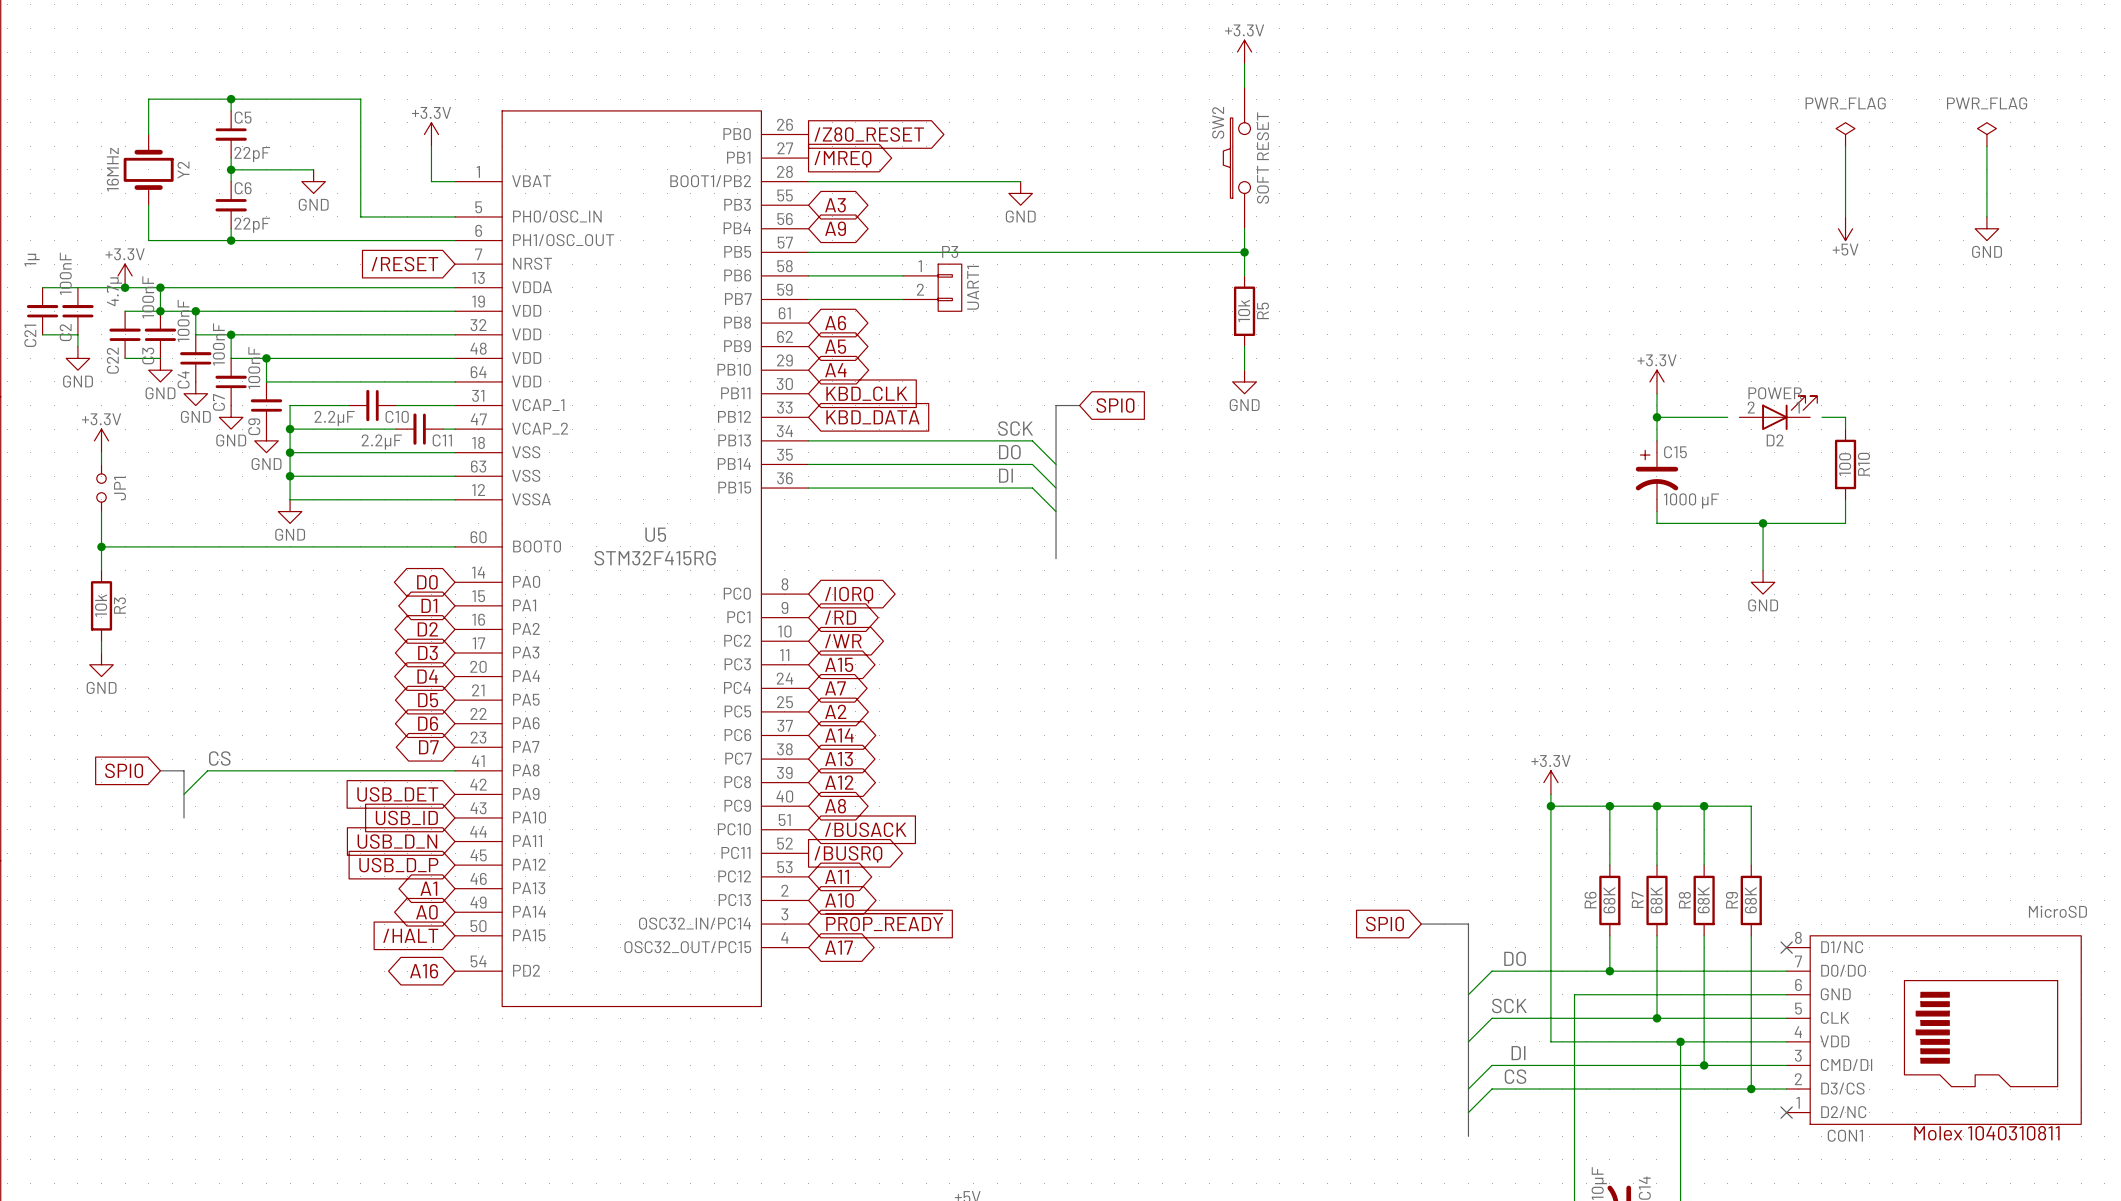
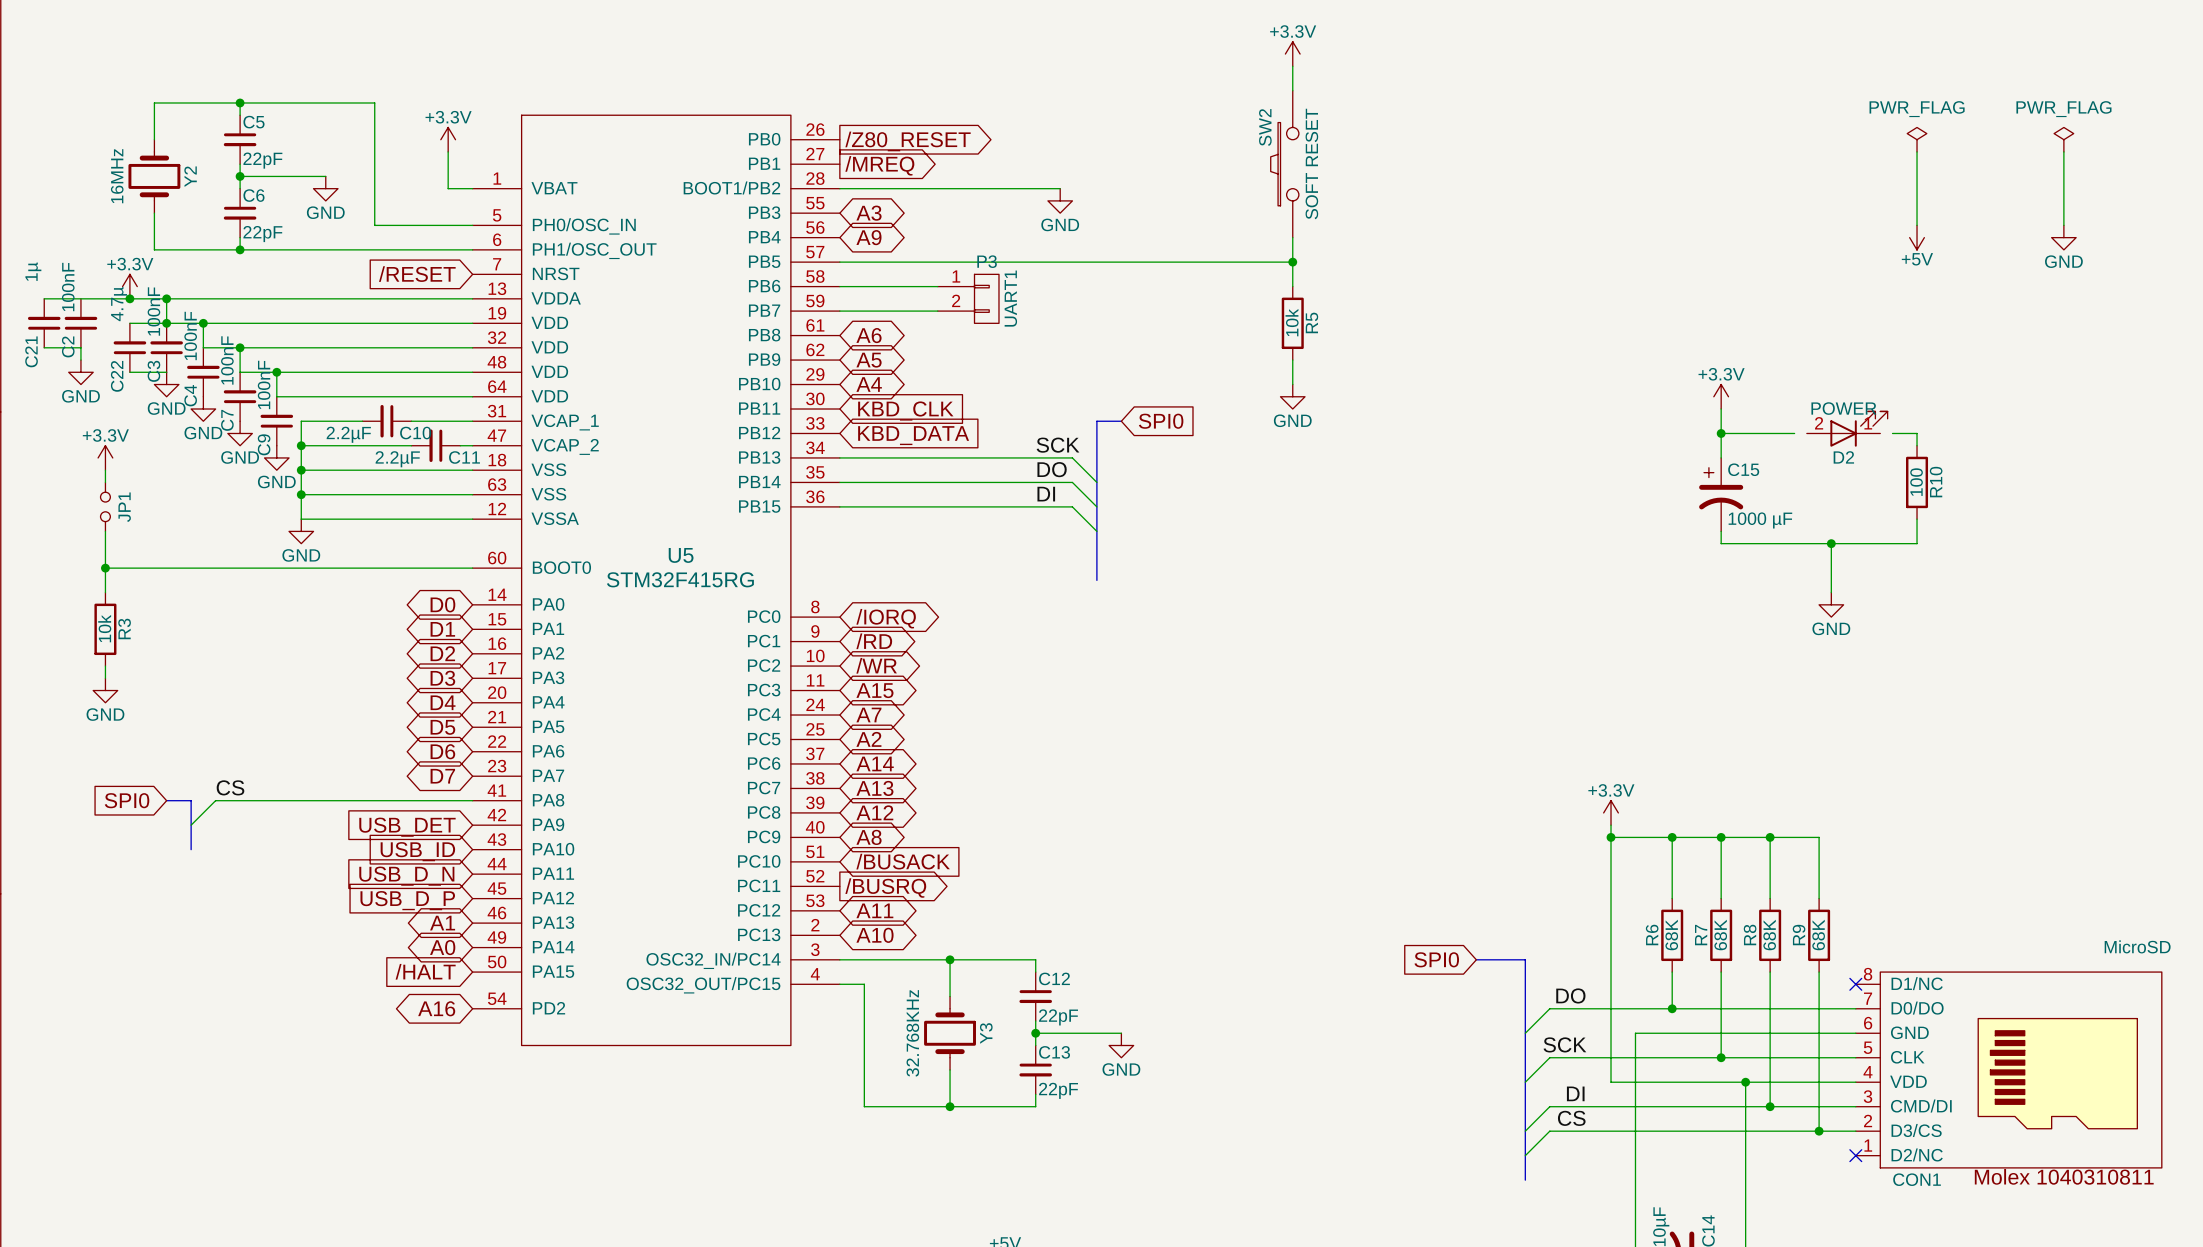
global label: ~{PROP_READY} (884, 922) -> none
wire: none -> (839, 959) (1035, 959) (1035, 972)
wire: none -> (950, 959) (950, 996)
junction: none -> (950, 959)
wire: none -> (839, 984) (864, 984) (864, 1106) (1035, 1106) (1035, 1094)
global label: A17 (839, 947) -> none
C12: none -> 22pF (1035, 996)
wire: none -> (1035, 1021) (1035, 1045)
Y3: none -> 32.768KHz (950, 1033)
wire: none -> (1035, 1033) (1121, 1033)
junction: none -> (1035, 1033)
power symbol: none -> GND (1121, 1045)
wire: none -> (950, 1069) (950, 1106)
C13: none -> 22pF (1035, 1069)
junction: none -> (950, 1106)

